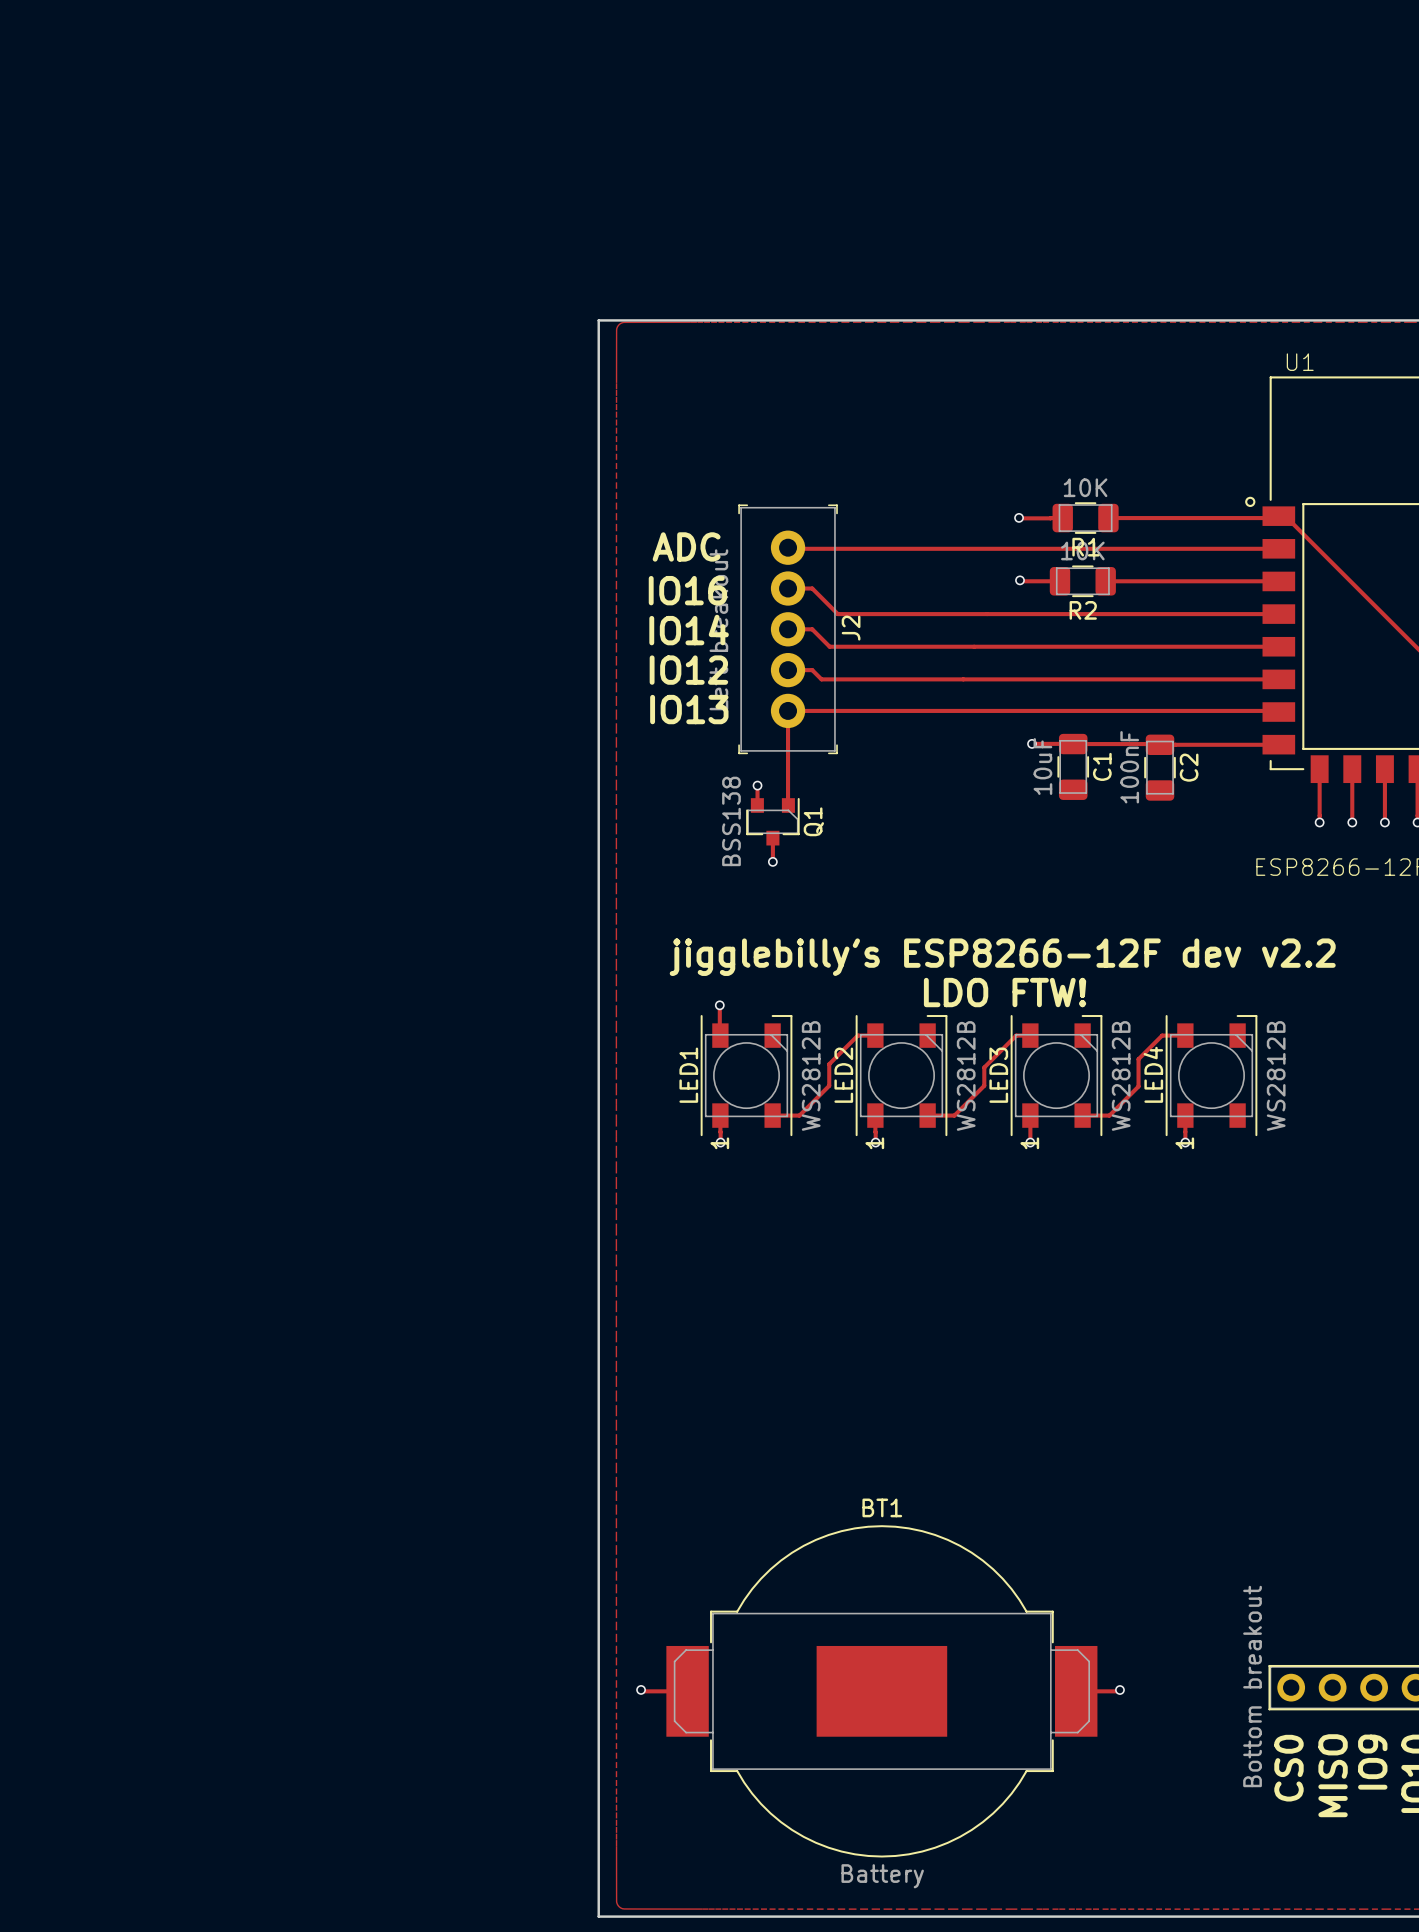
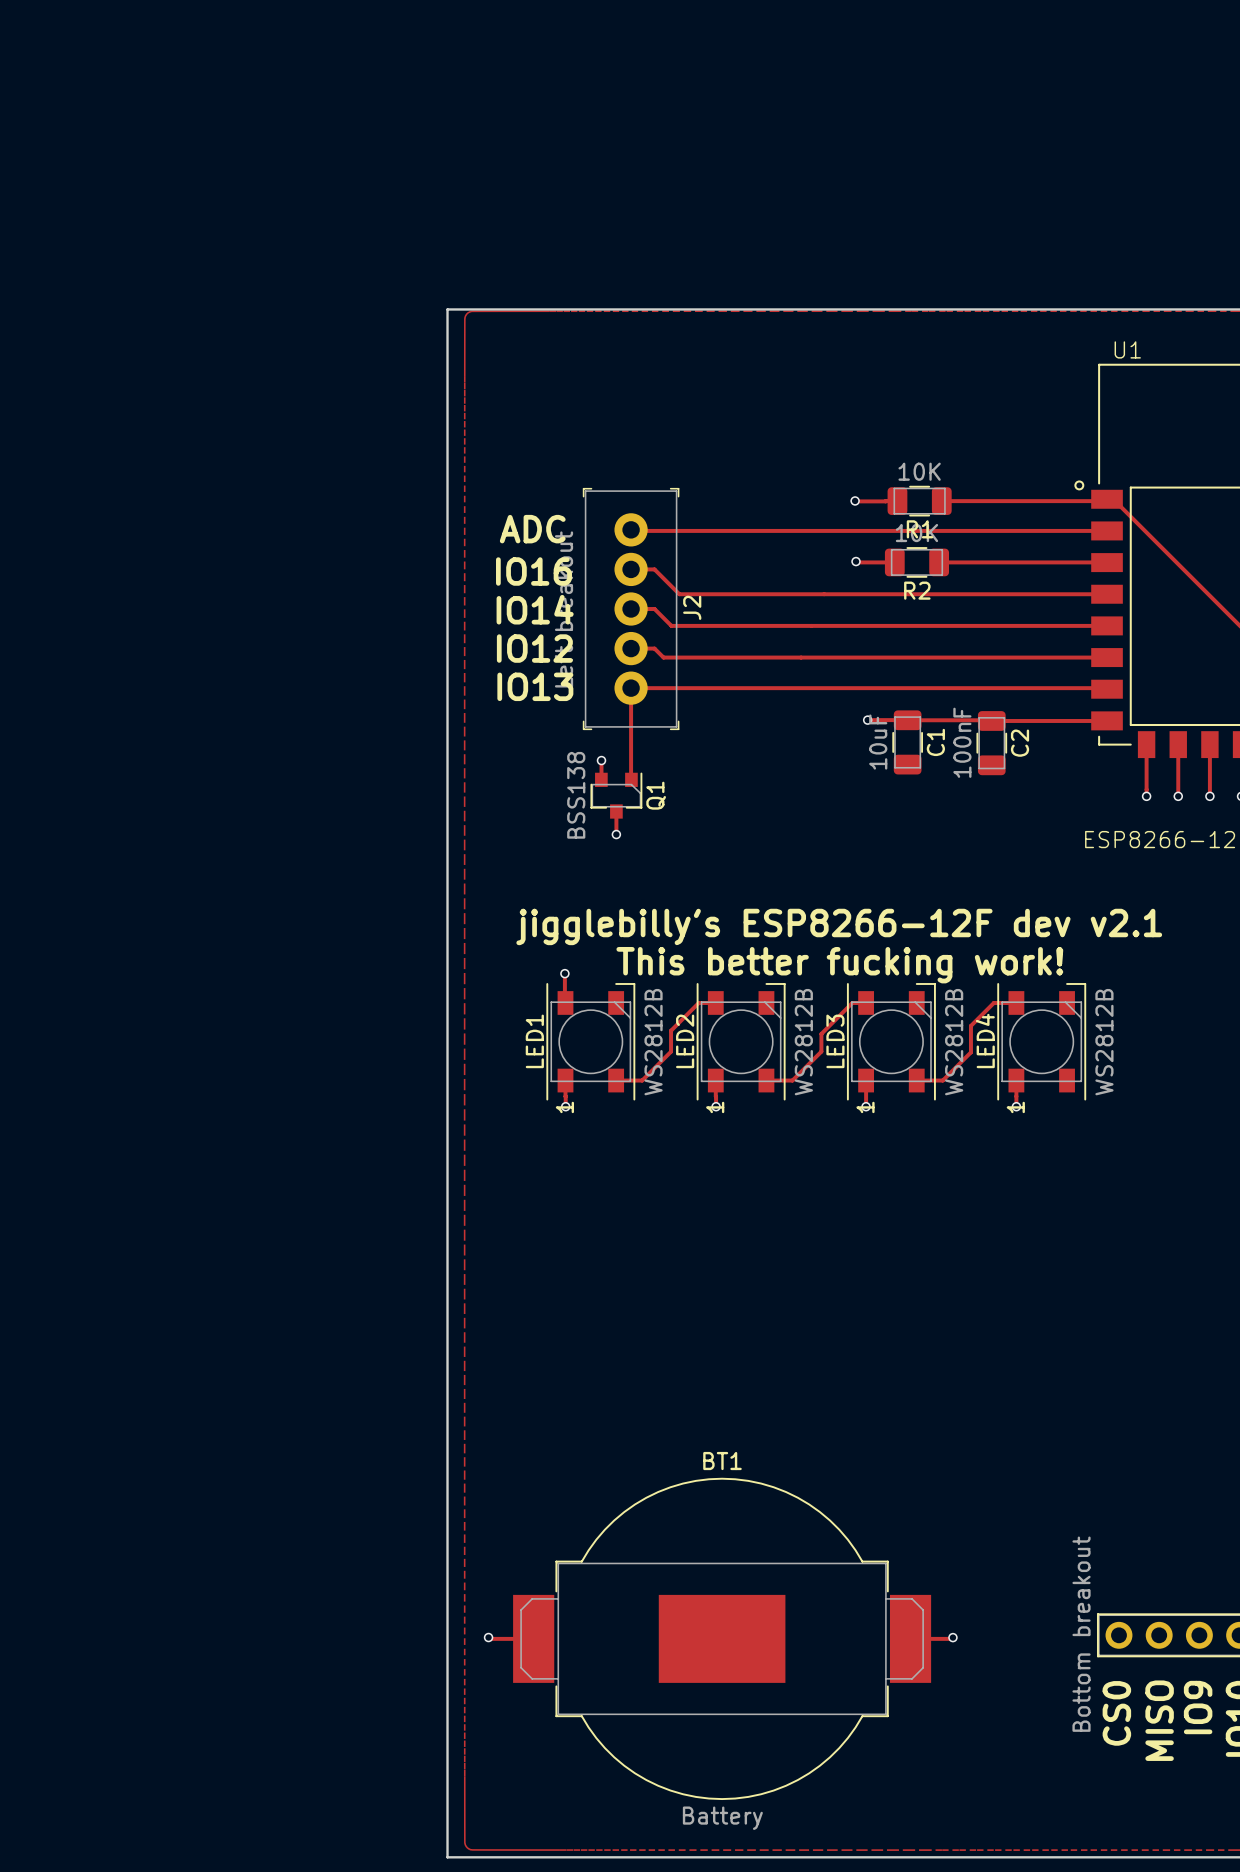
text: jigglebilly's ESP8266-12F dev v2.2 (1002, 957) -> jigglebilly's ESP8266-12F dev v2.1 (839, 926)
text: LDO FTW! (1005, 992) -> This better fucking work! (839, 965)

